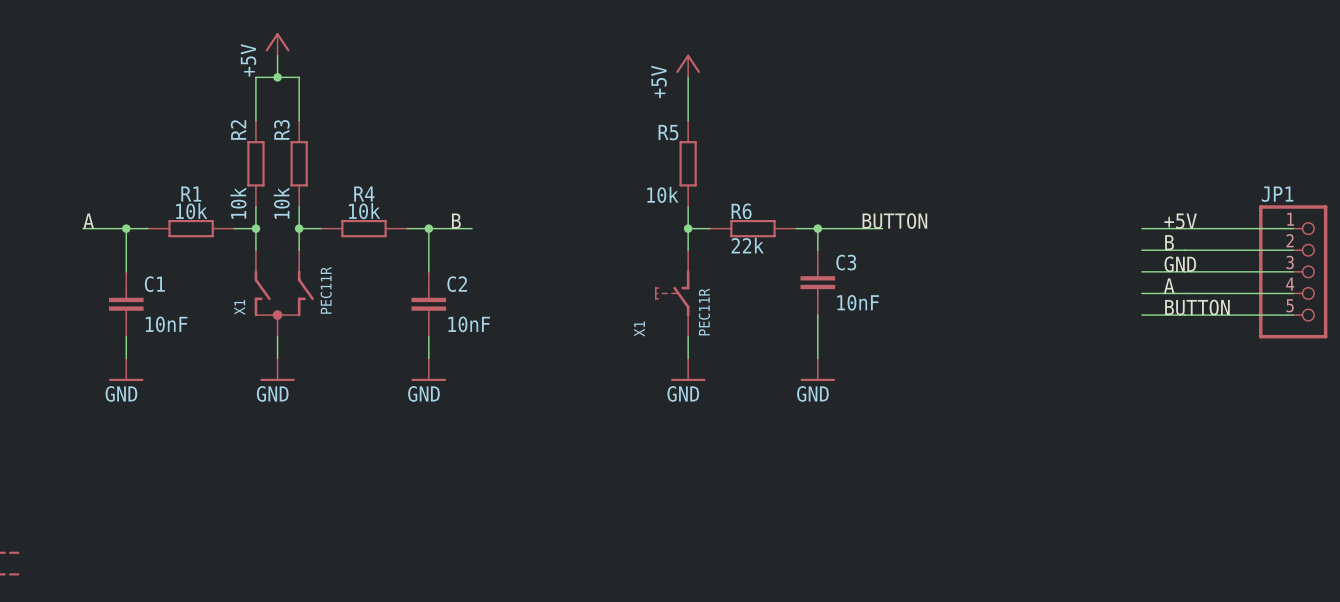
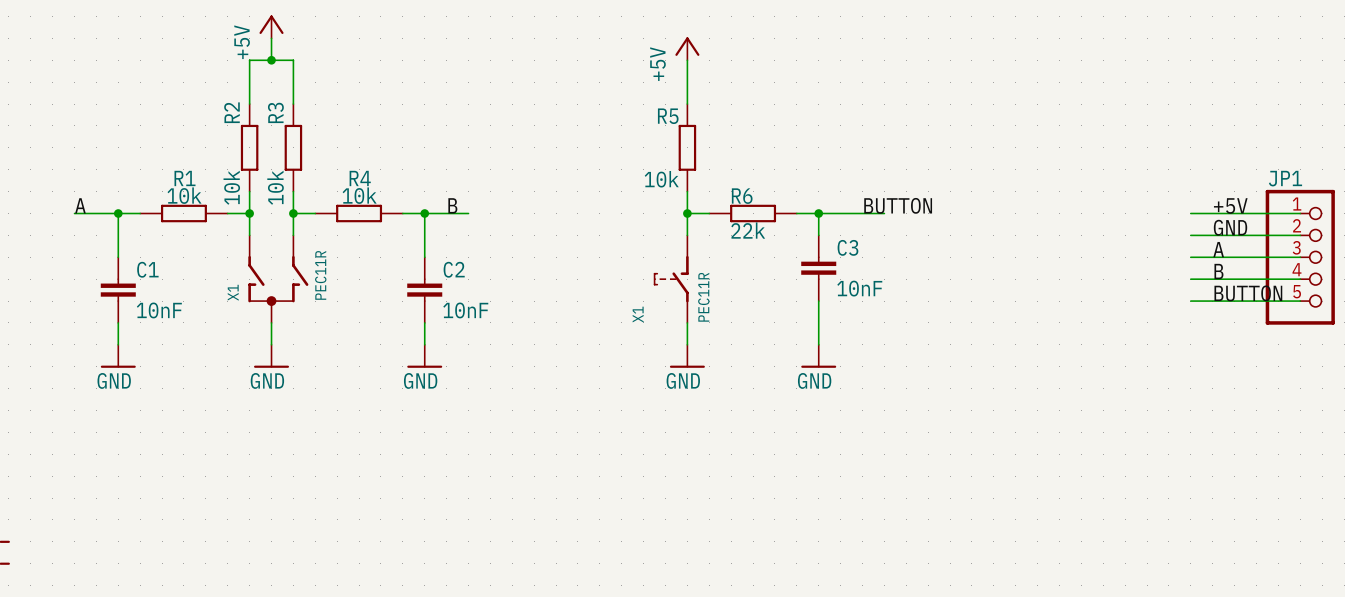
label position: +5V (1180, 221) -> +5V (1230, 205)
wire: (1141, 228) (1185, 228) -> none
label position: B (1169, 242) -> B (1218, 271)
wire: (1141, 250) (1185, 250) -> none
label position: GND (1180, 264) -> GND (1230, 227)
wire: (1141, 271) (1185, 271) -> none
label position: A (1169, 285) -> A (1218, 249)
wire: (1141, 293) (1185, 293) -> none
label position: BUTTON (1197, 307) -> BUTTON (1248, 293)
wire: (1141, 315) (1185, 315) -> none

